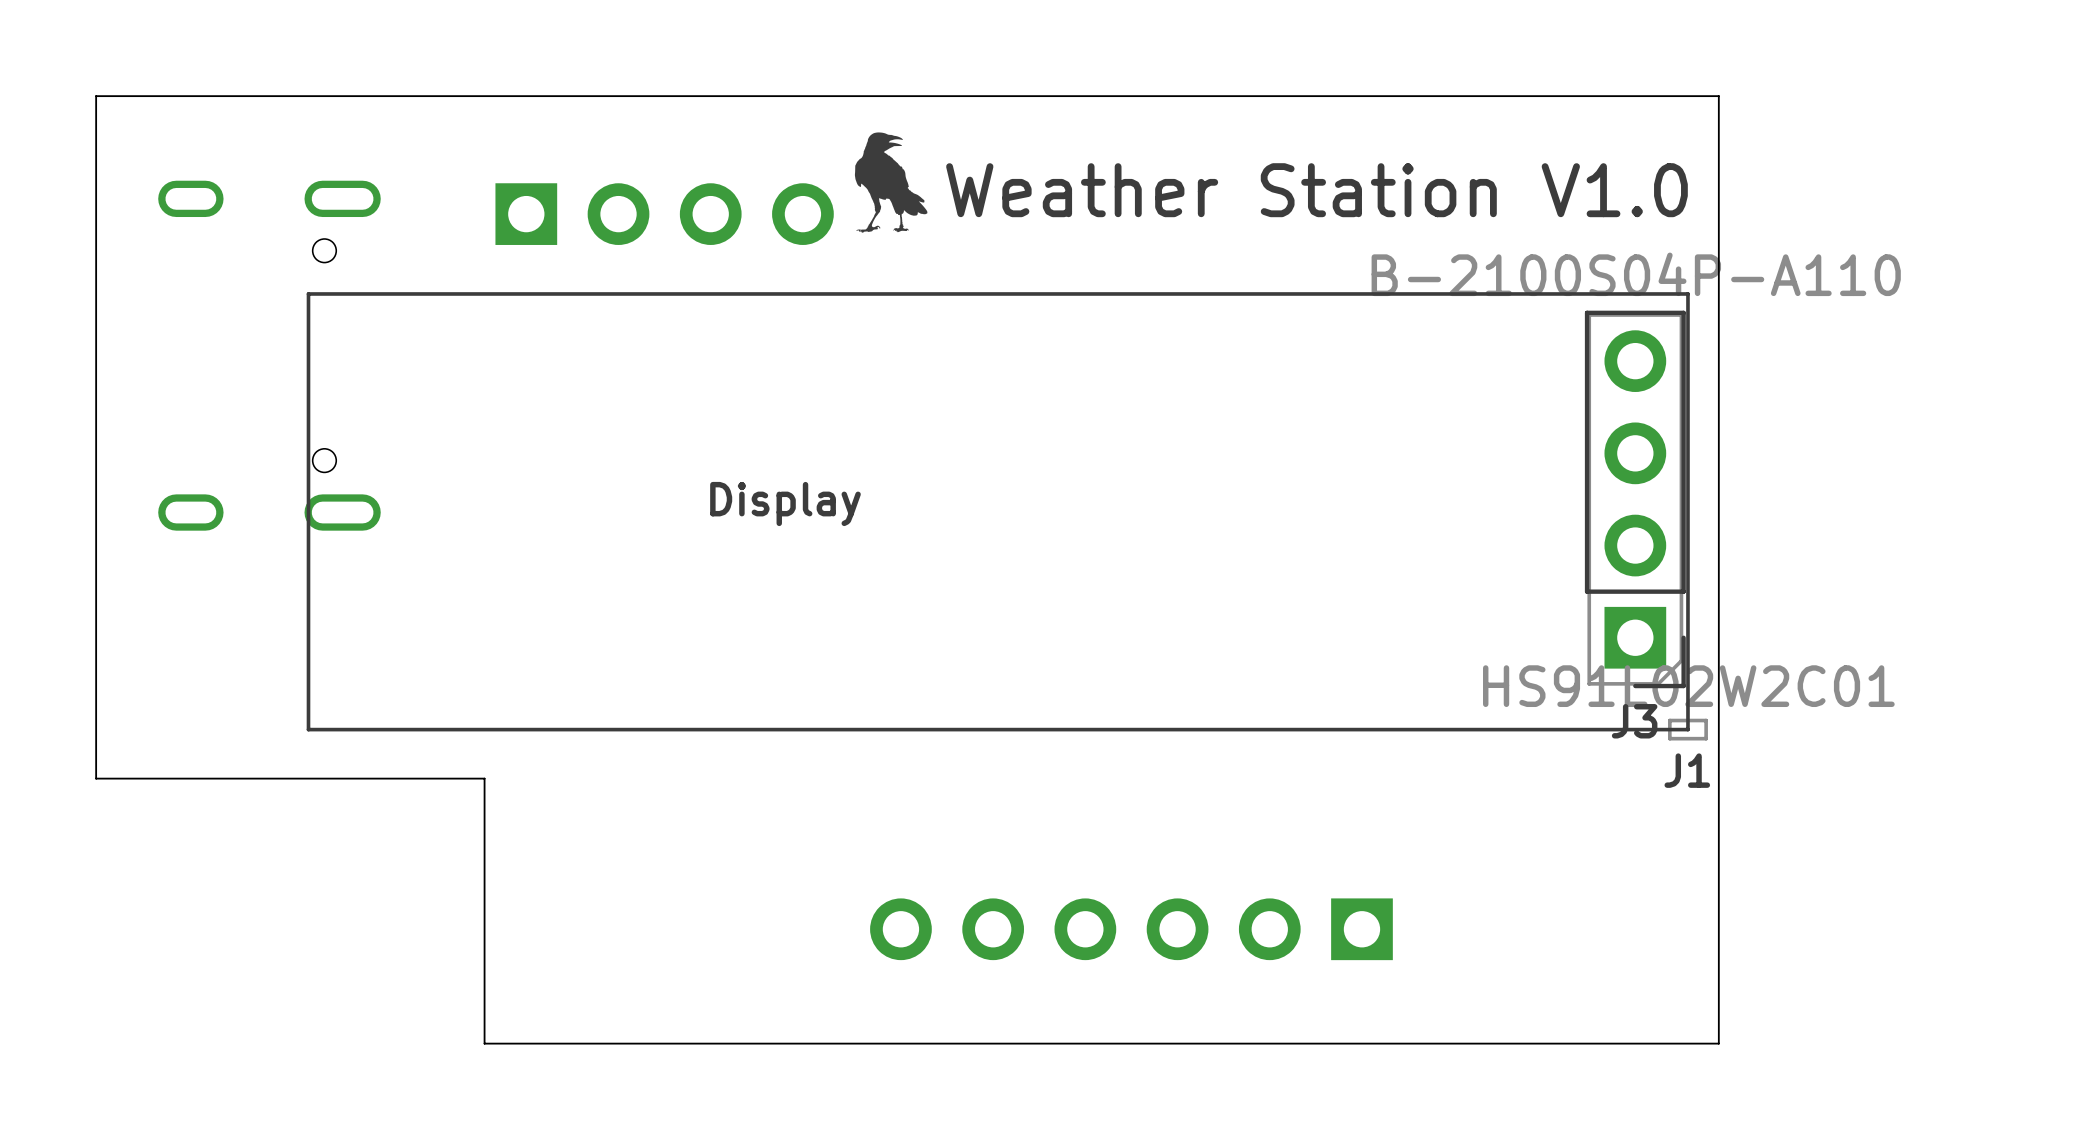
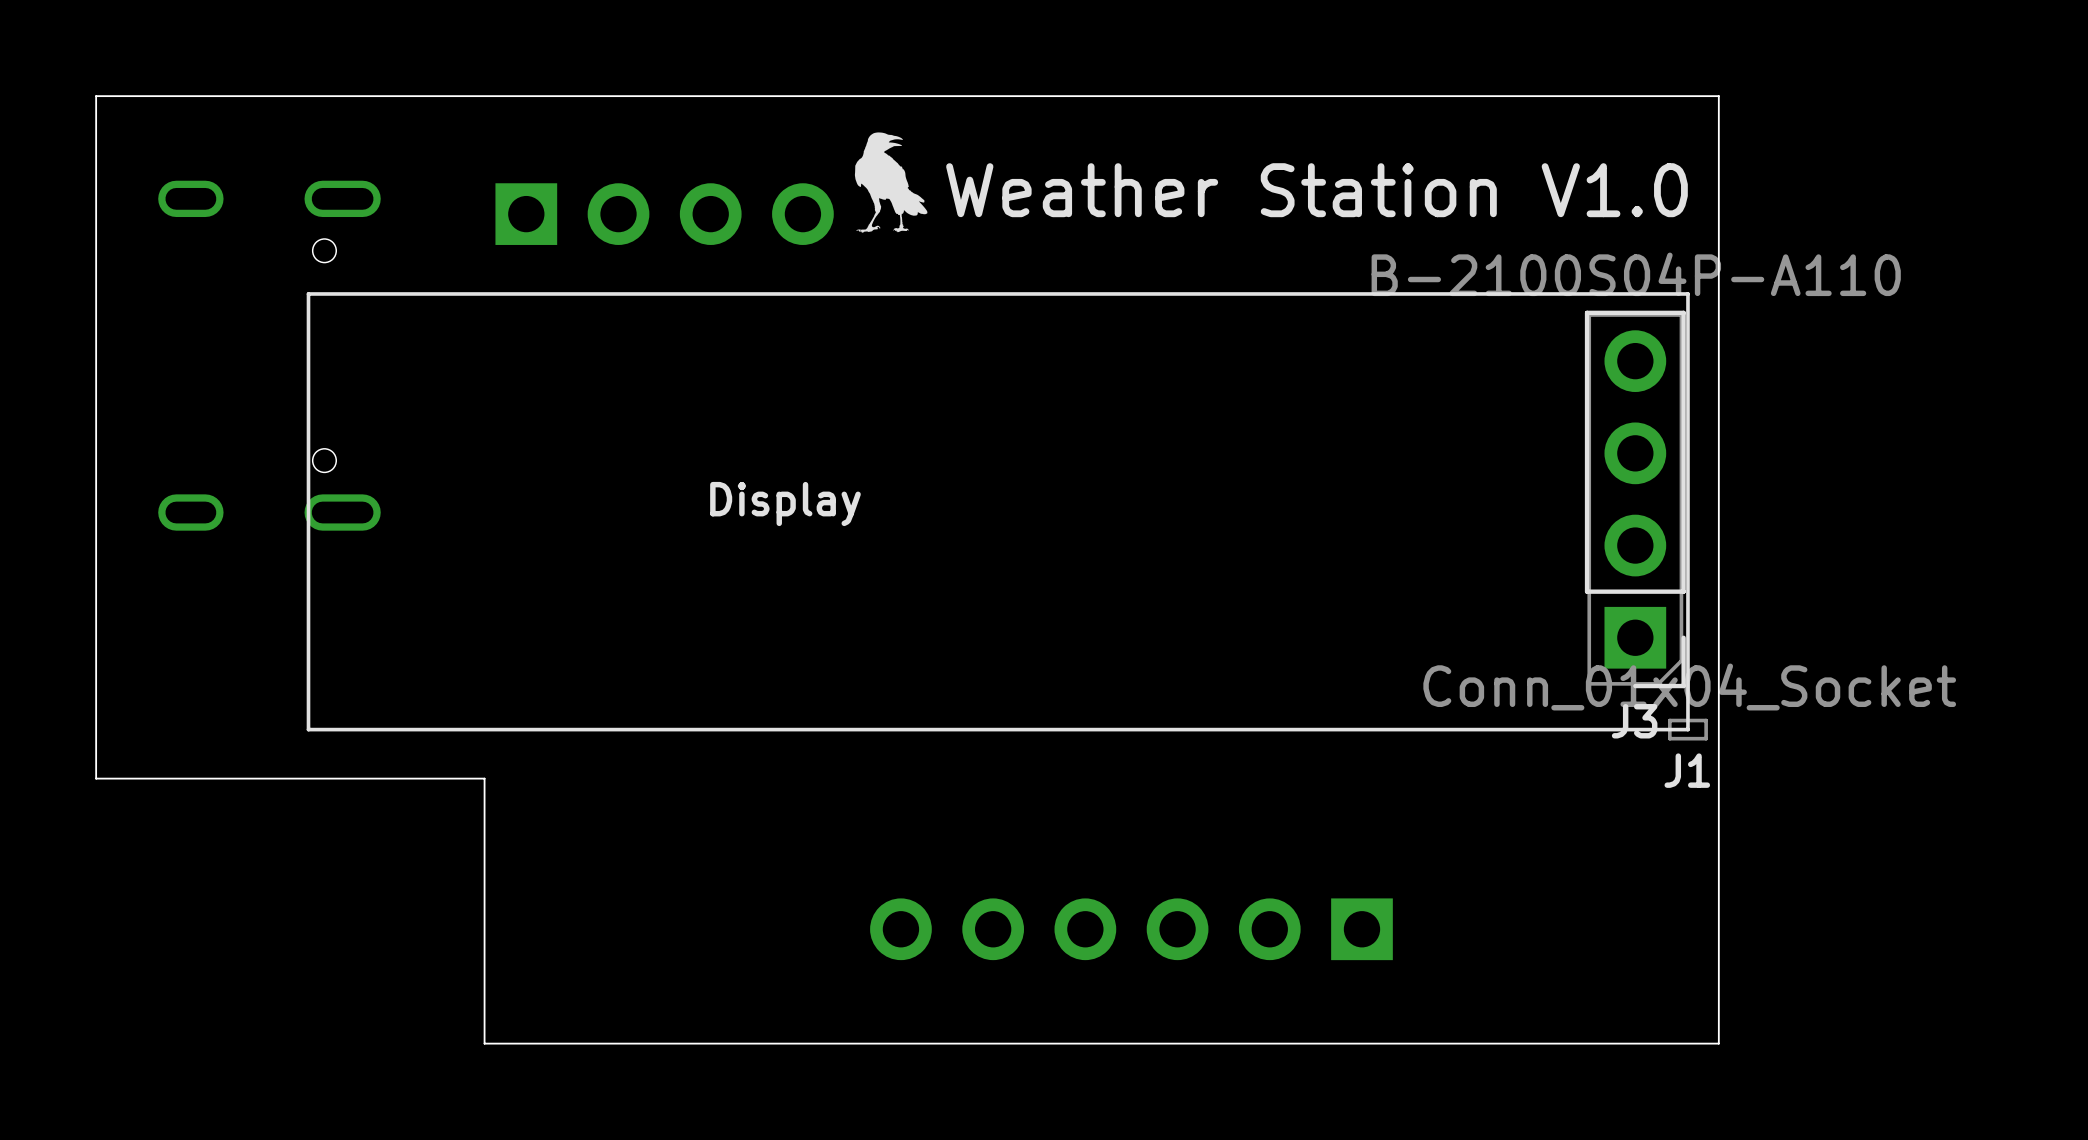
J1 value: HS91L02W2C01 (1688, 686) -> Conn_01x04_Socket (1689, 687)

